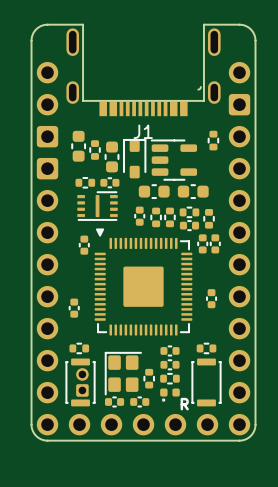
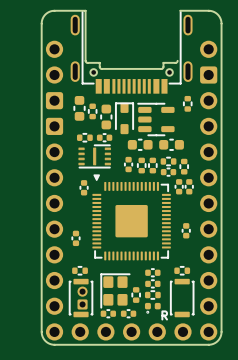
board edge: (83, 24) (83, 100) (203, 100) (203, 24) -> (83, 10) (85, 10) (86, 62) (99, 62) (101, 68) (161, 68) (163, 62) (175, 62)
J1: (143, 72) -> none
part: none -> (131, 52)

